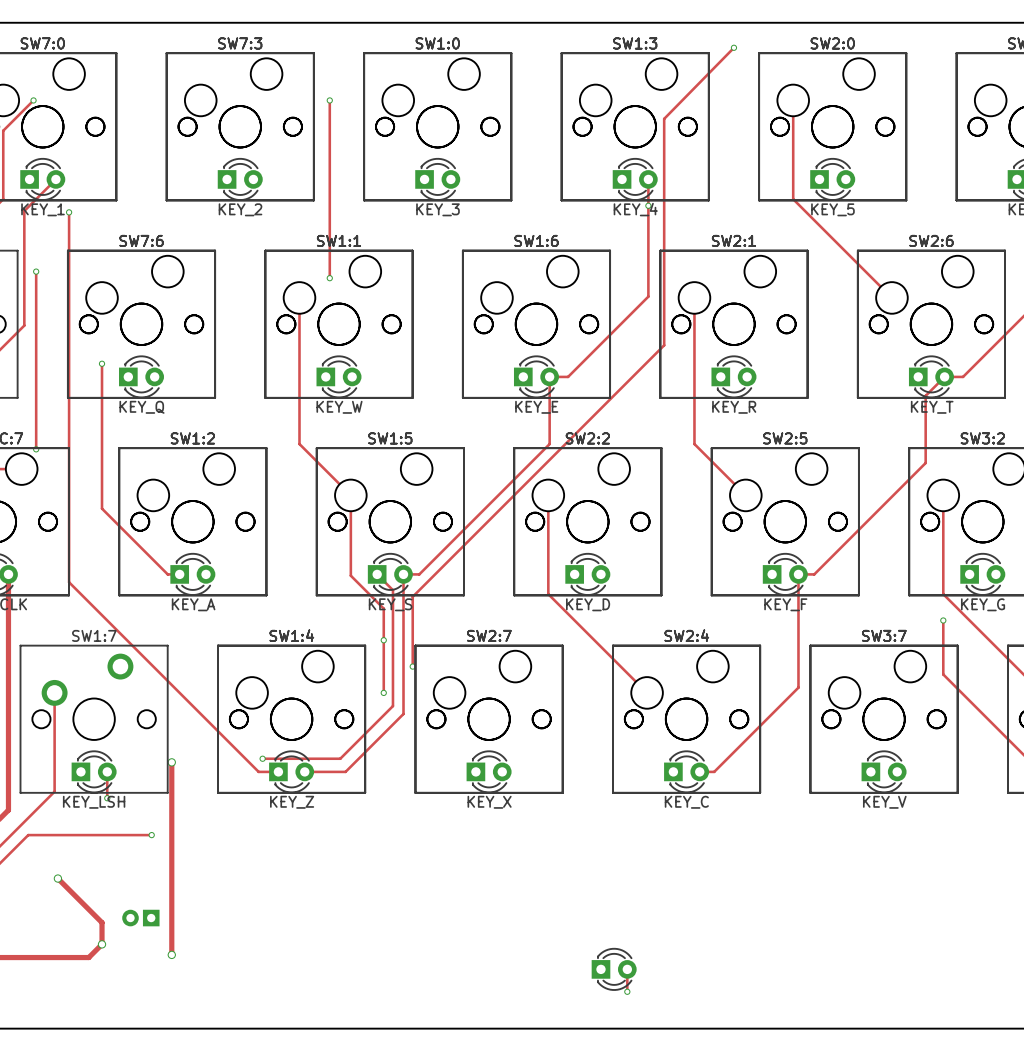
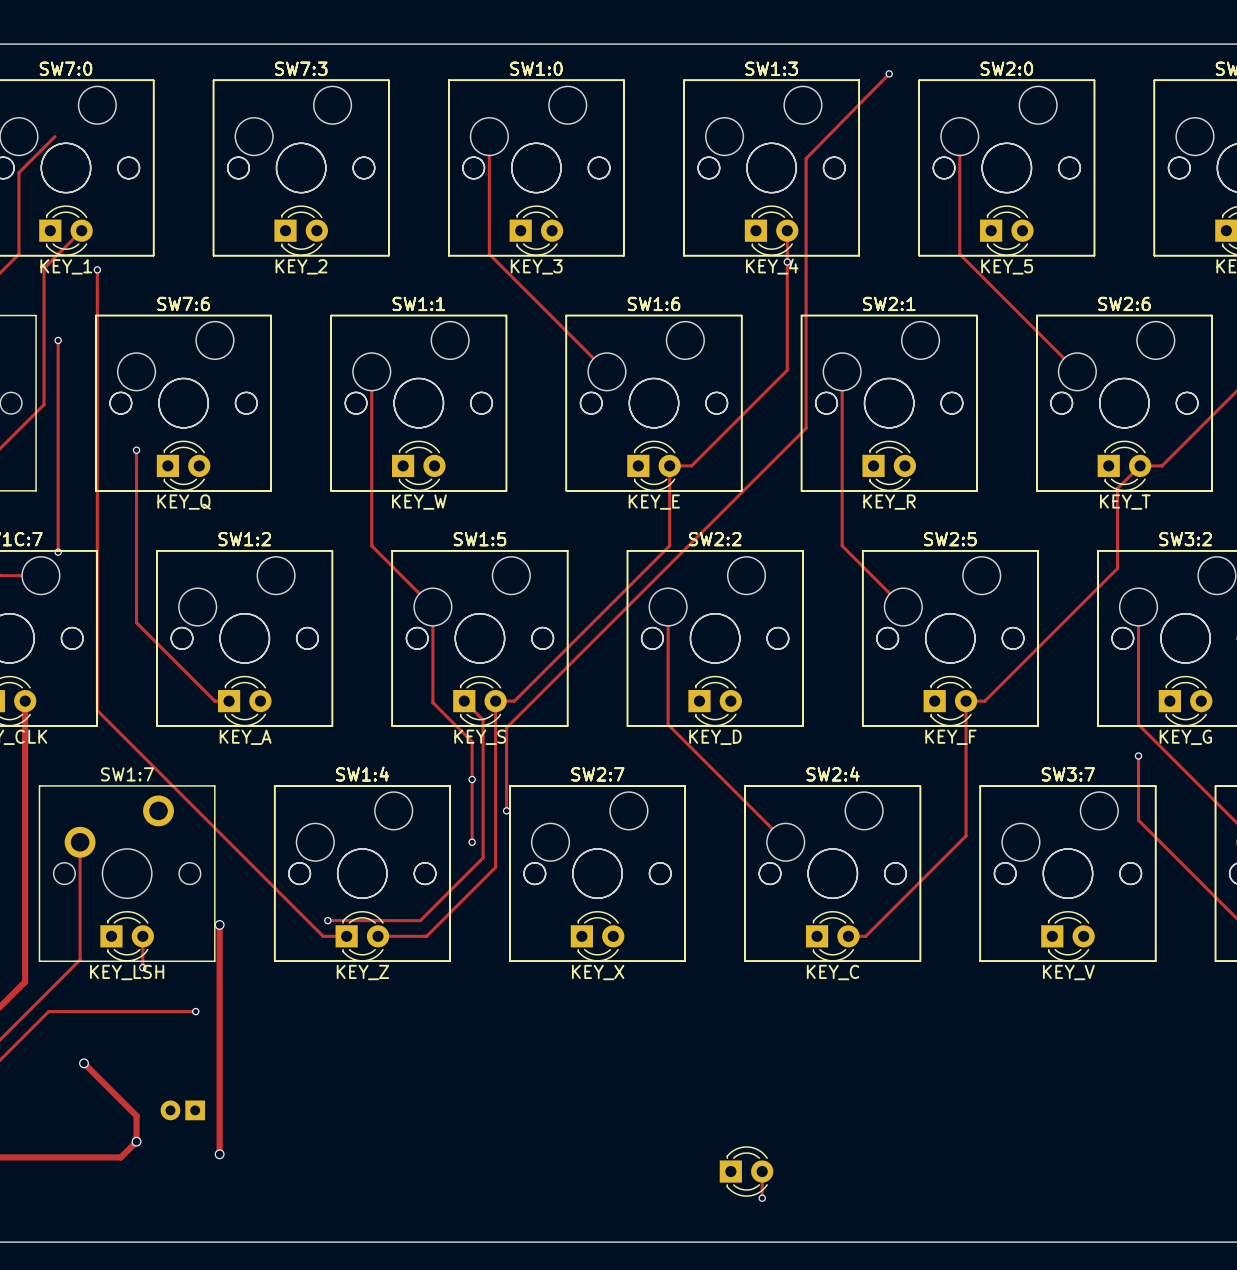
via: (33, 100) -> none
track: (329, 100) (329, 278) -> none
via: (329, 100) -> none
track: none -> (489, 136) (489, 254) (606, 371)
via: (329, 278) -> none

